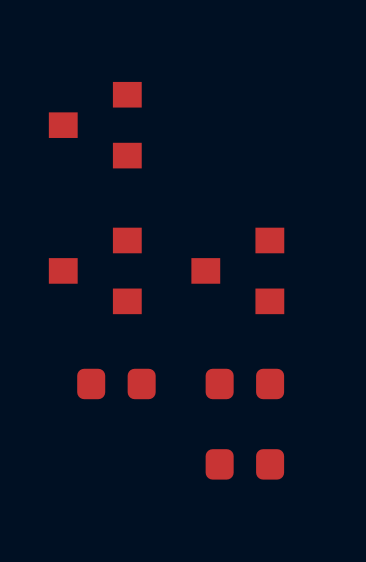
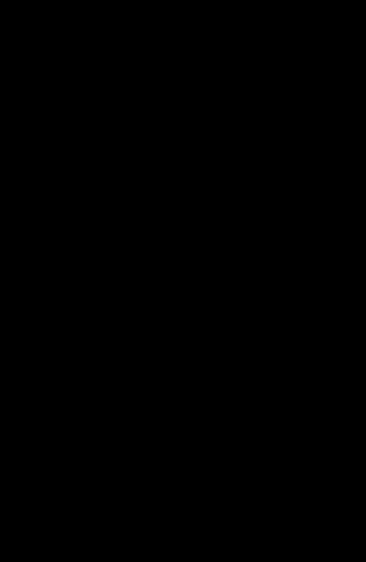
part: (95, 125) -> none
part: (95, 270) -> none
part: (237, 270) -> none
part: (116, 383) -> none
part: (244, 383) -> none
part: (244, 464) -> none

